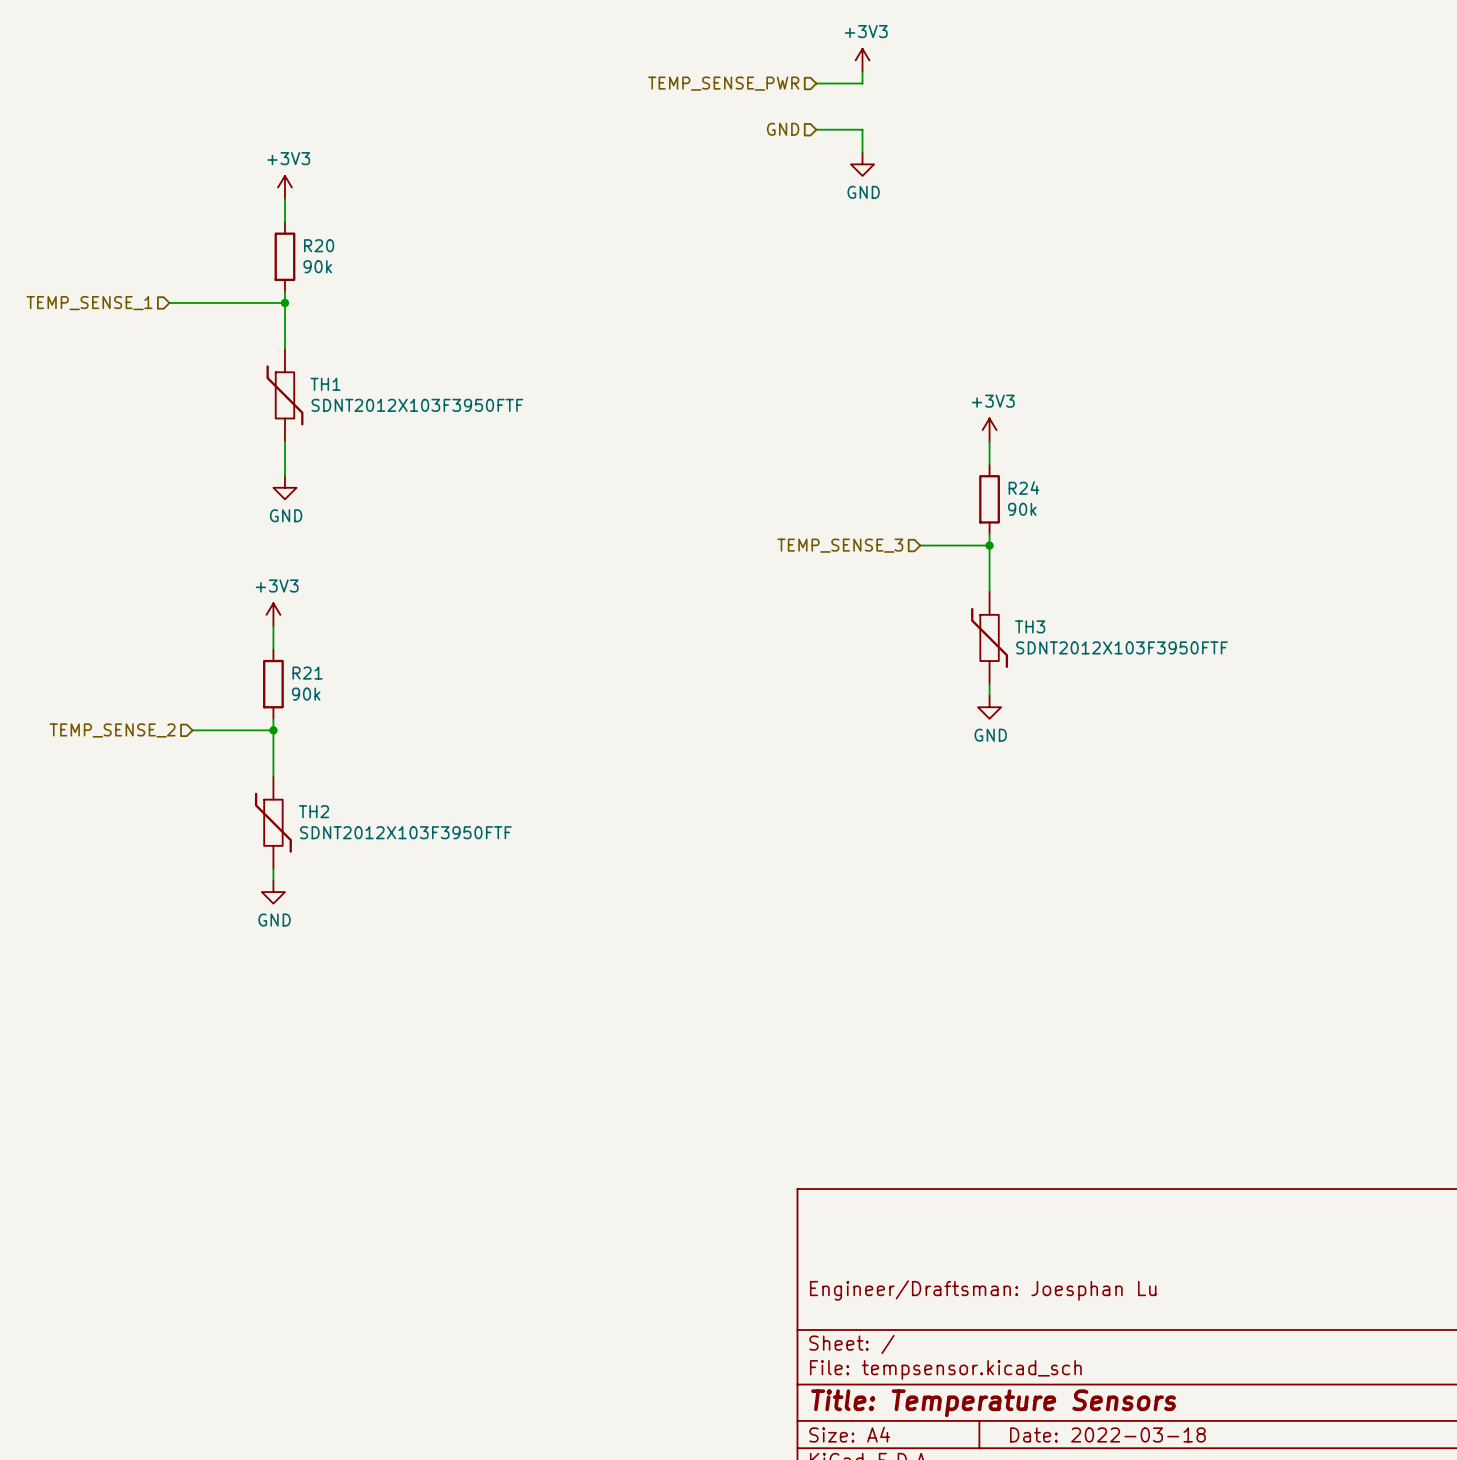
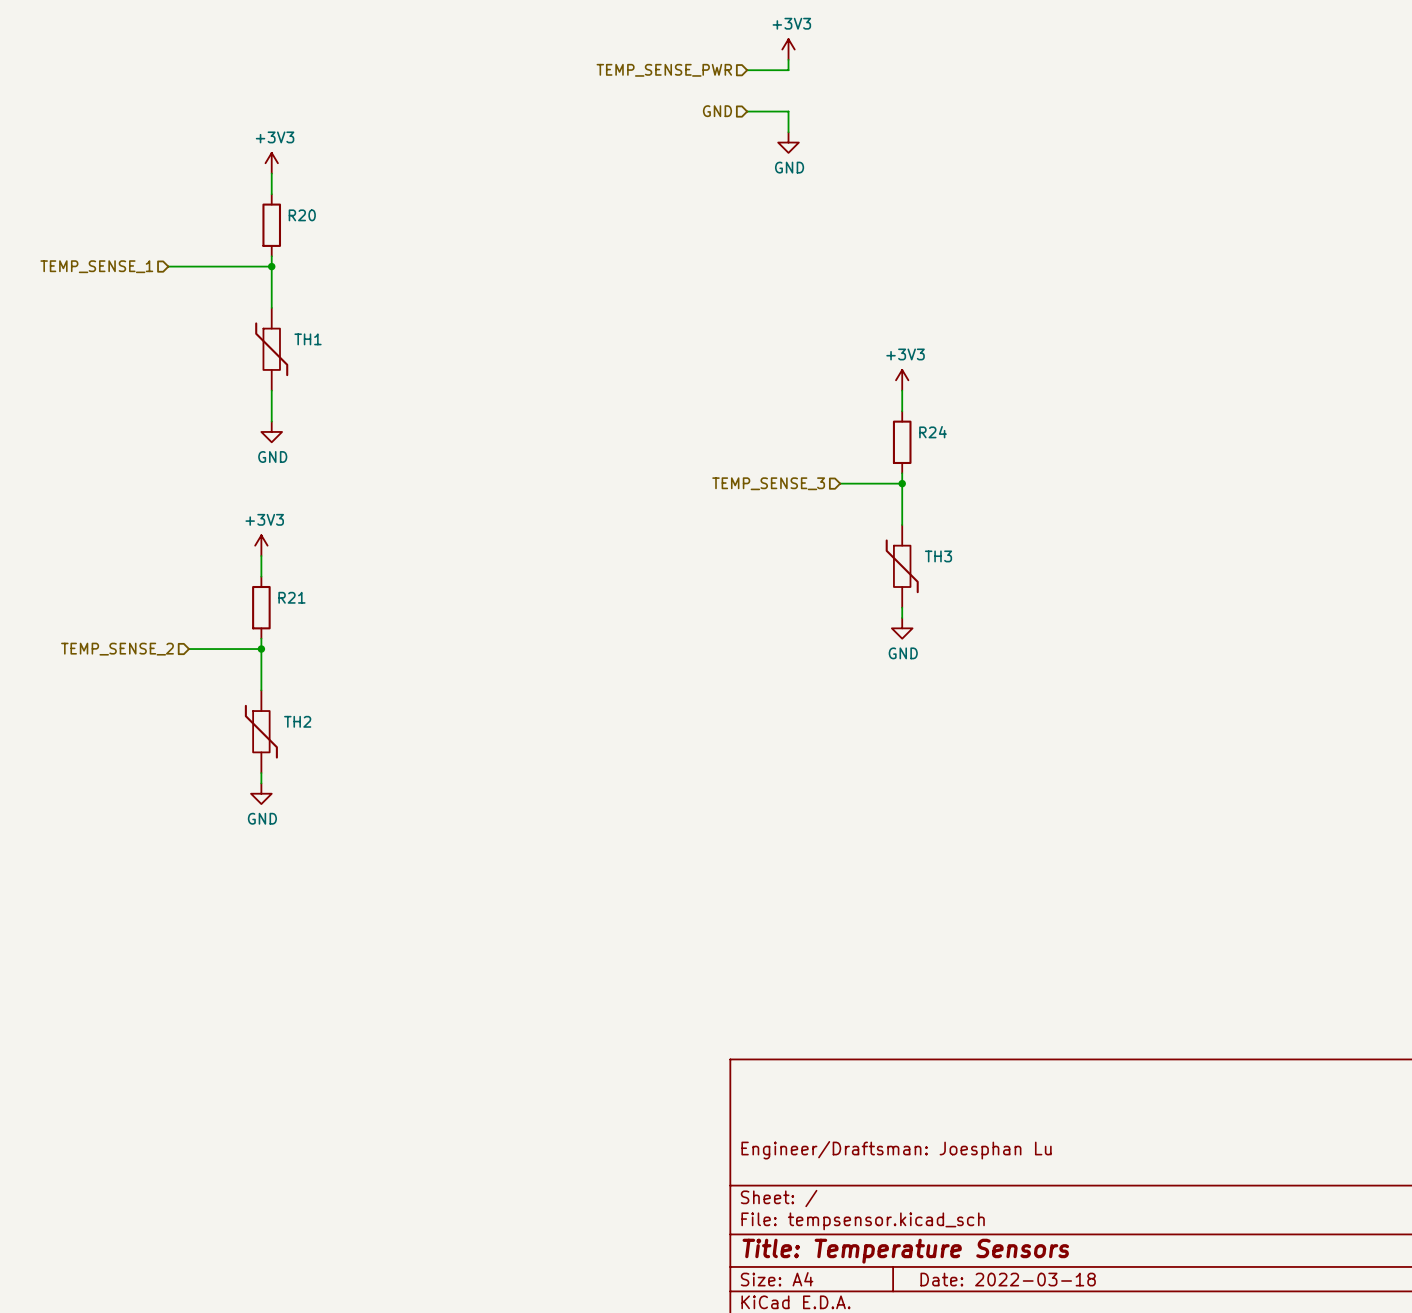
R20 value: 90k (317, 266) -> none
TH1 value: SDNT2012X103F3950FTF (417, 405) -> none
R24 value: 90k (1022, 509) -> none
TH3 value: SDNT2012X103F3950FTF (1121, 647) -> none
R21 value: 90k (306, 694) -> none
TH2 value: SDNT2012X103F3950FTF (405, 832) -> none

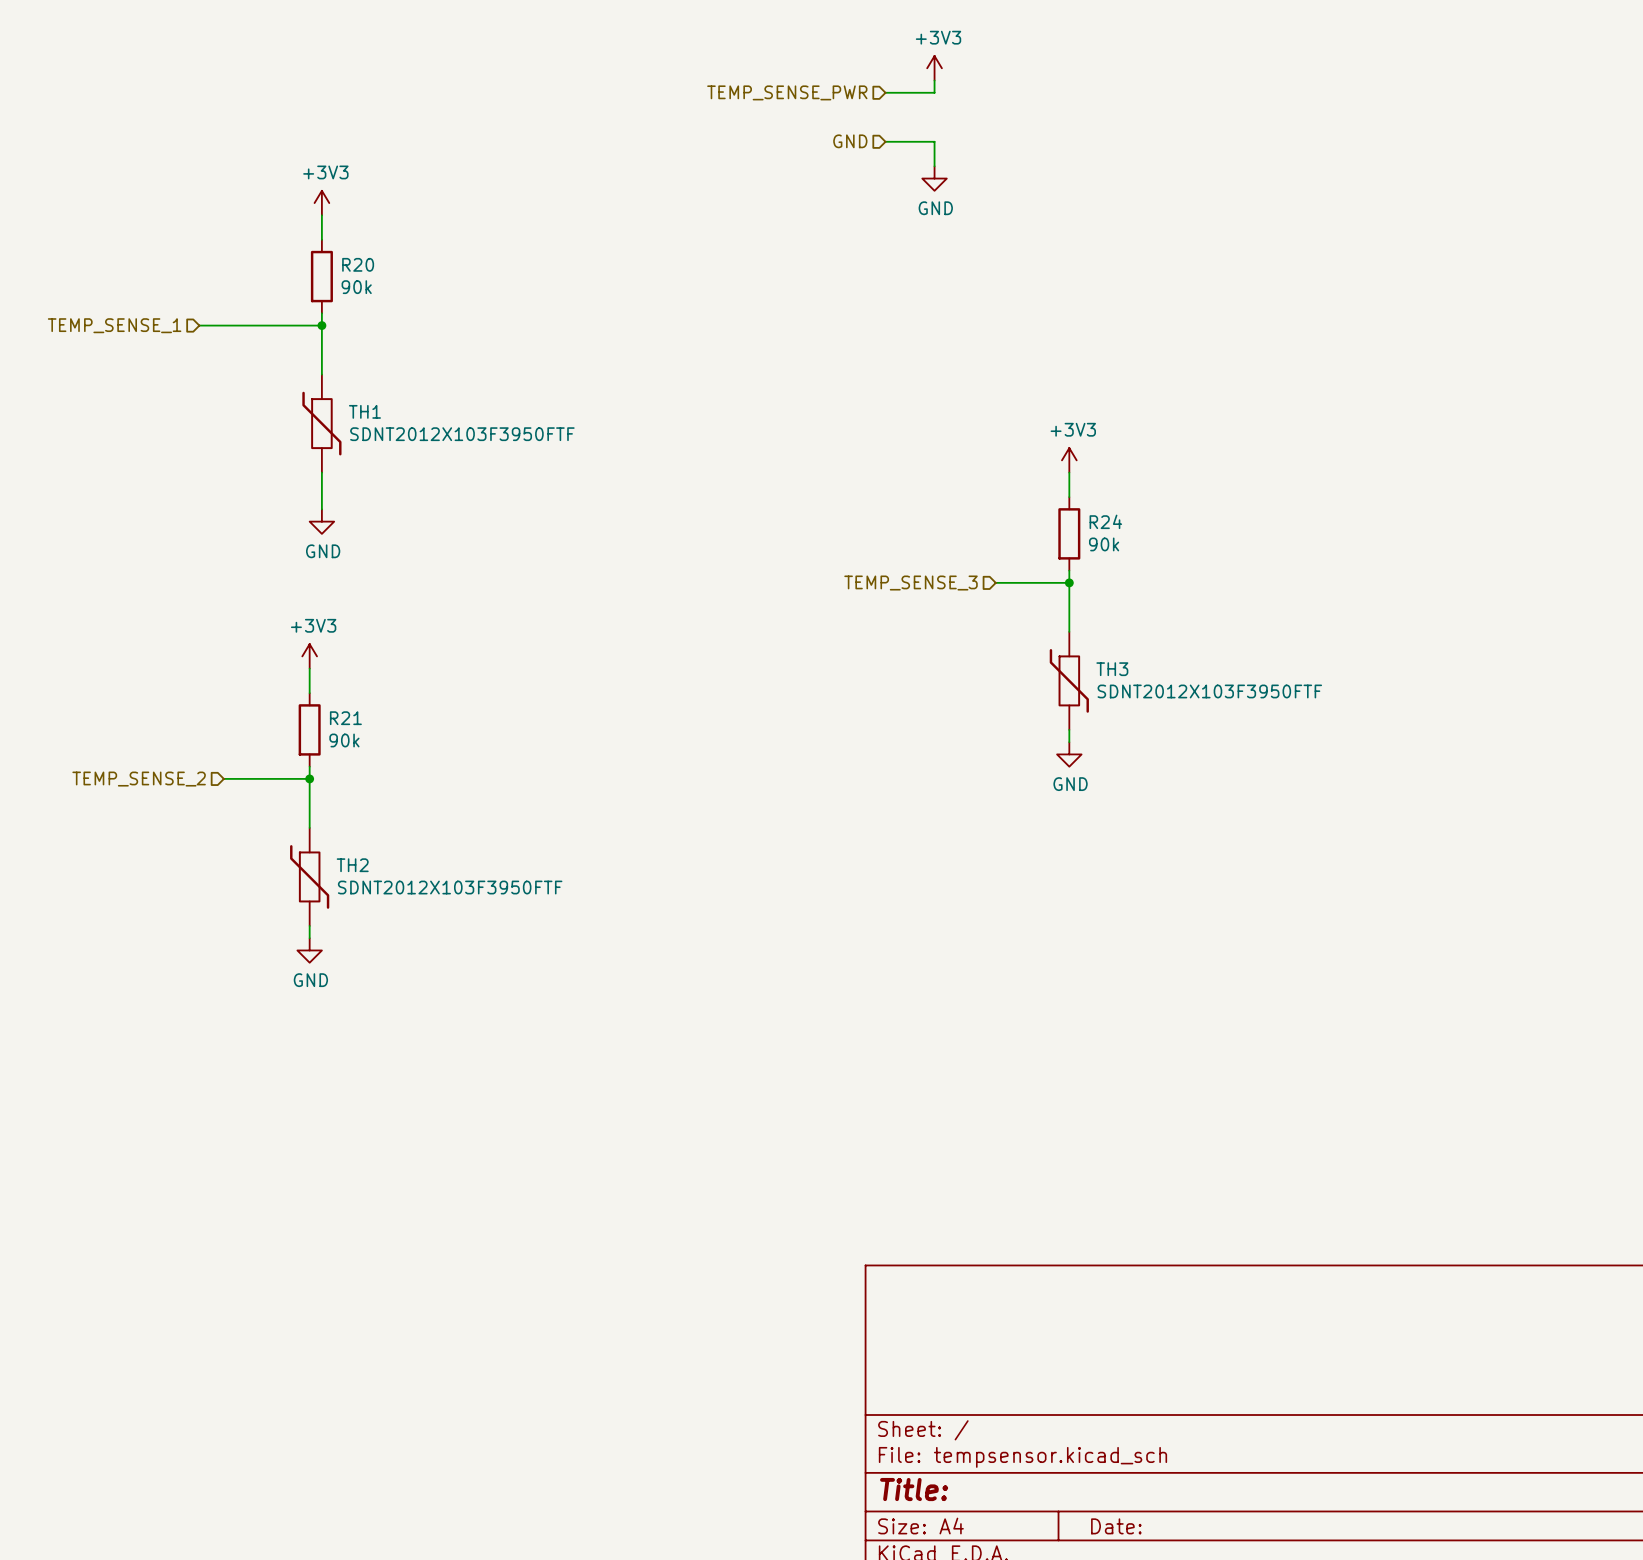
R20 value: none -> 90k (356, 287)
TH1 value: none -> SDNT2012X103F3950FTF (462, 434)
R24 value: none -> 90k (1104, 544)
TH3 value: none -> SDNT2012X103F3950FTF (1209, 691)
R21 value: none -> 90k (344, 740)
TH2 value: none -> SDNT2012X103F3950FTF (450, 887)
title block: Engineer/Draftsman: Joesphan Lu (896, 1150) -> none
title block: Title: Temperature Sensors (905, 1251) -> Title: (914, 1489)
title block: Date: 2022-03-18 (1008, 1279) -> Date: (1116, 1526)

